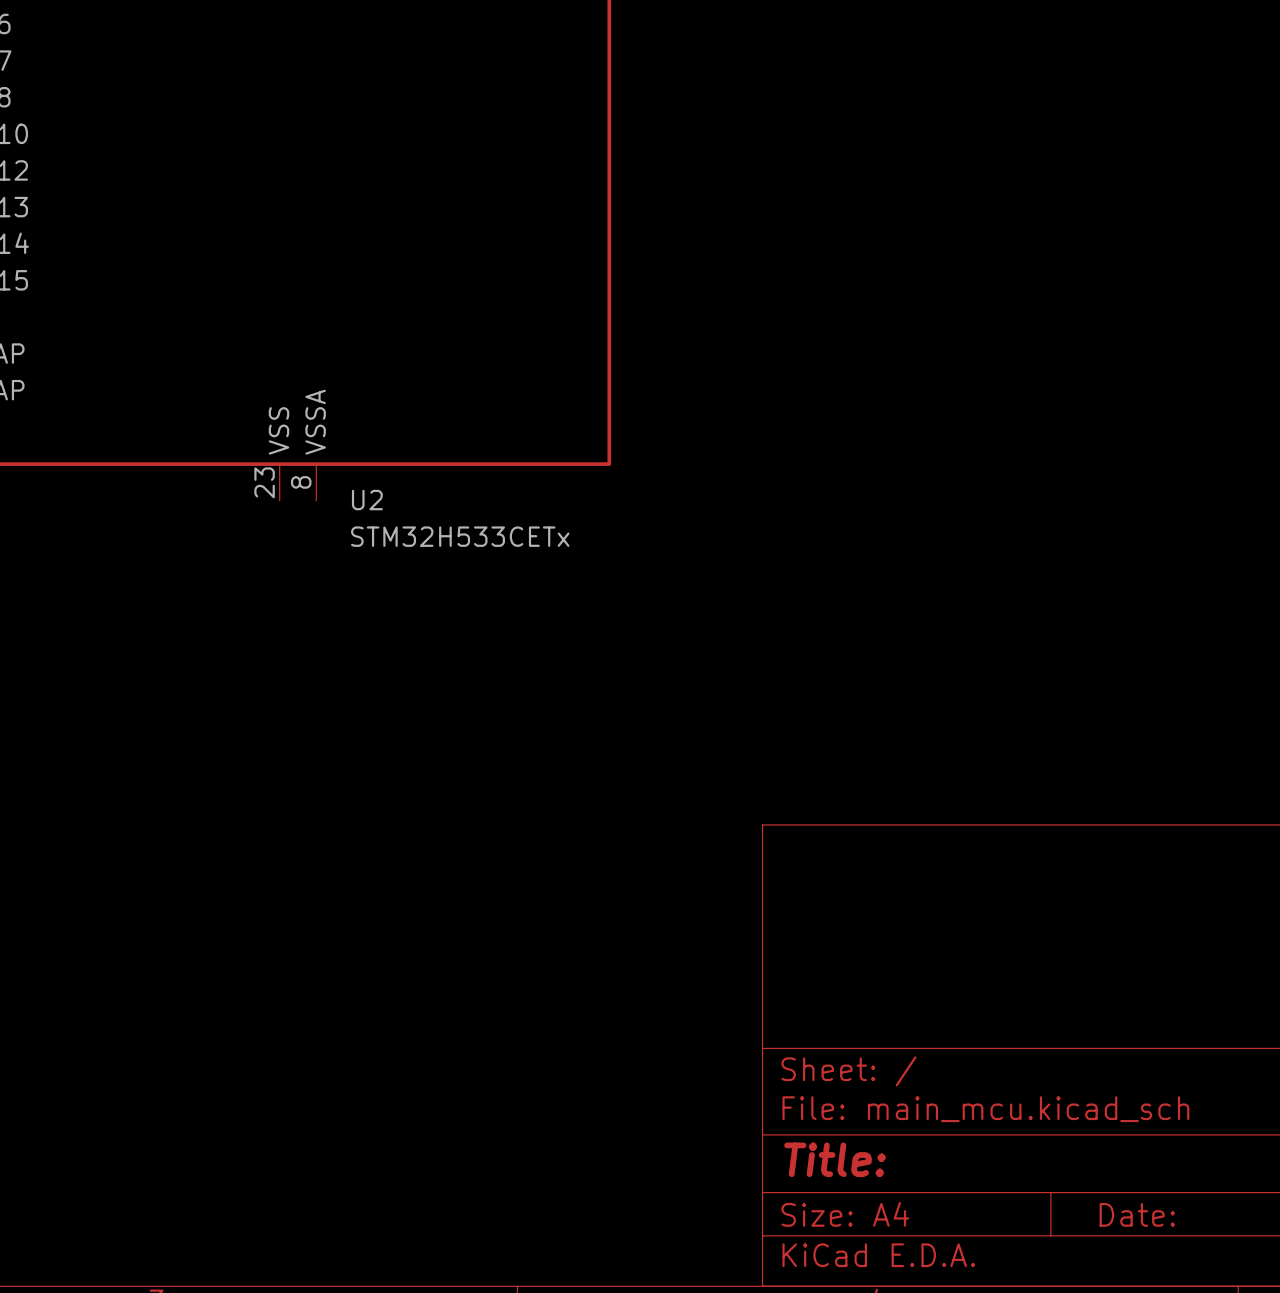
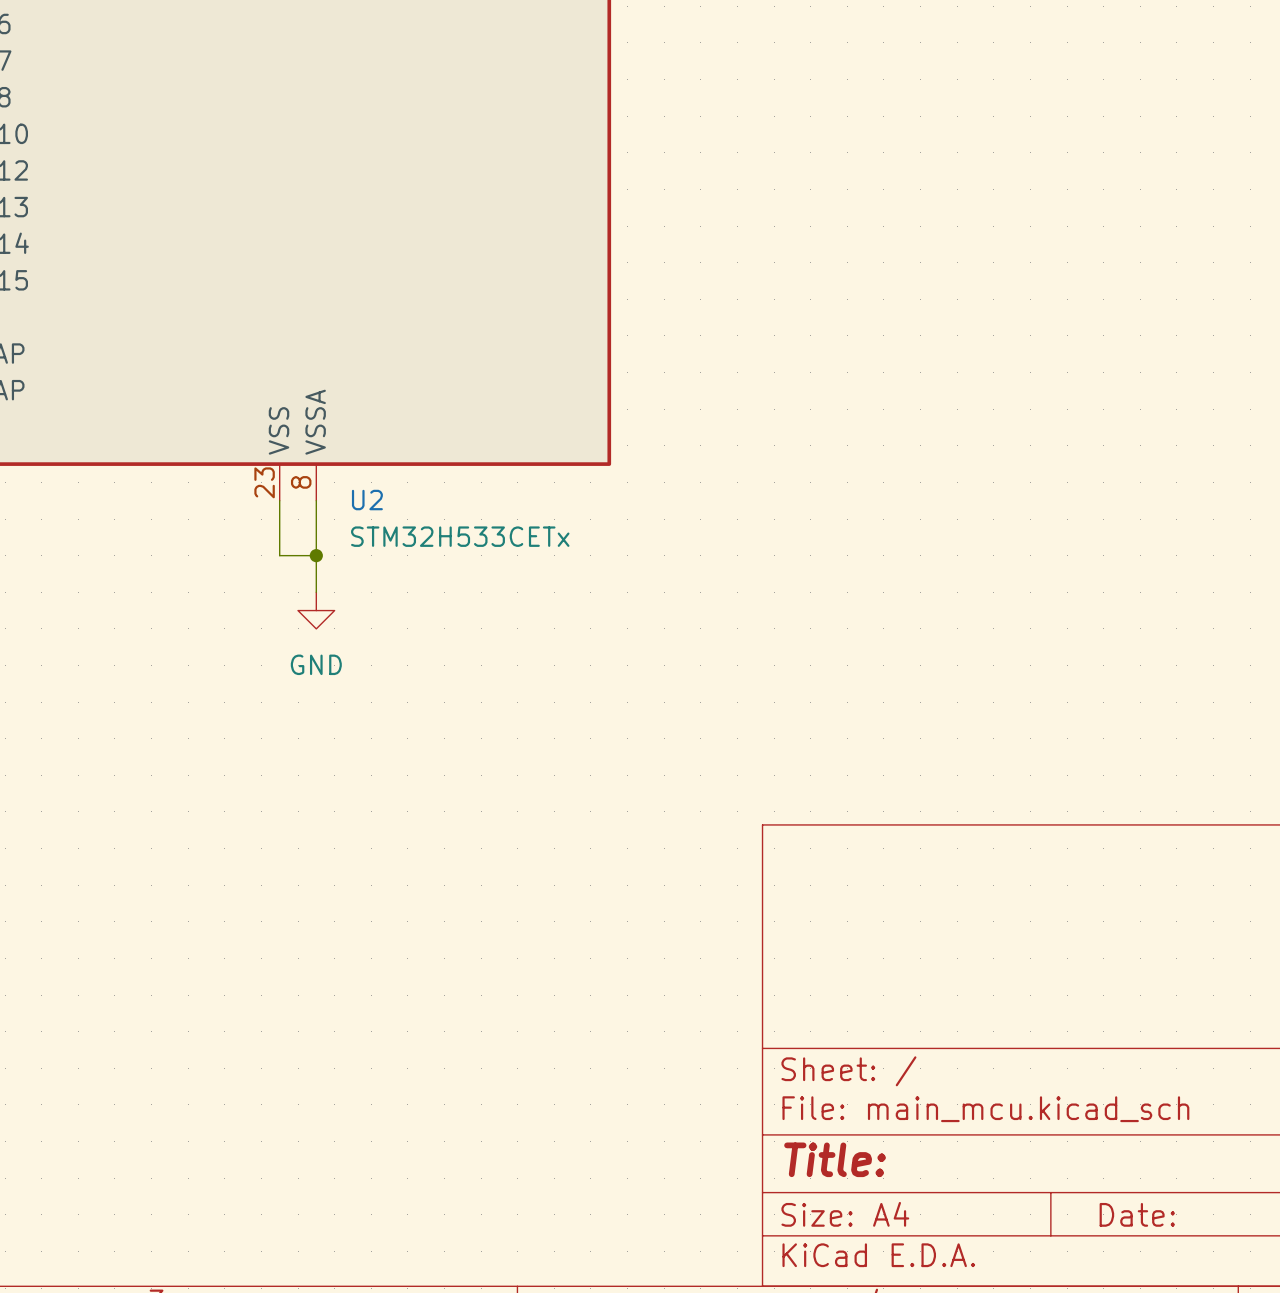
wire: none -> (279, 500) (279, 555) (316, 555)
wire: none -> (316, 500) (316, 592)
junction: none -> (316, 555)
power symbol: none -> GND (316, 610)

